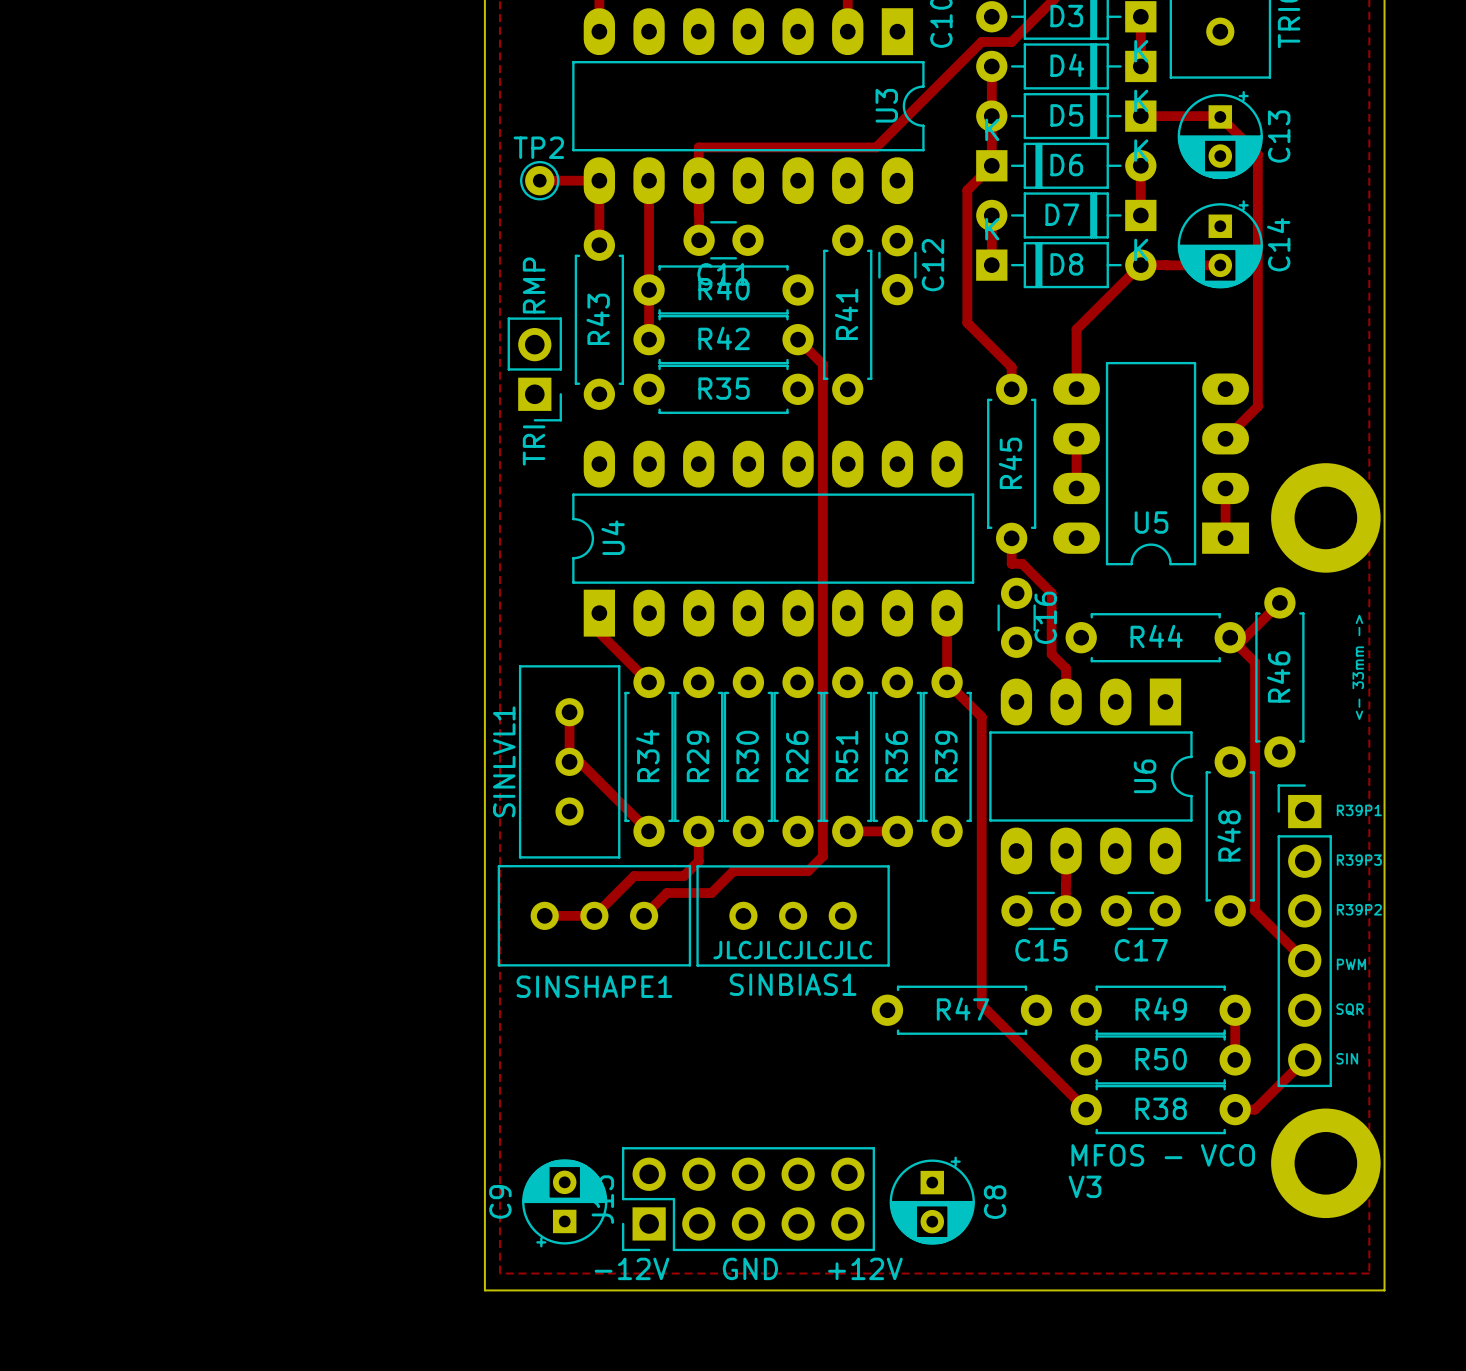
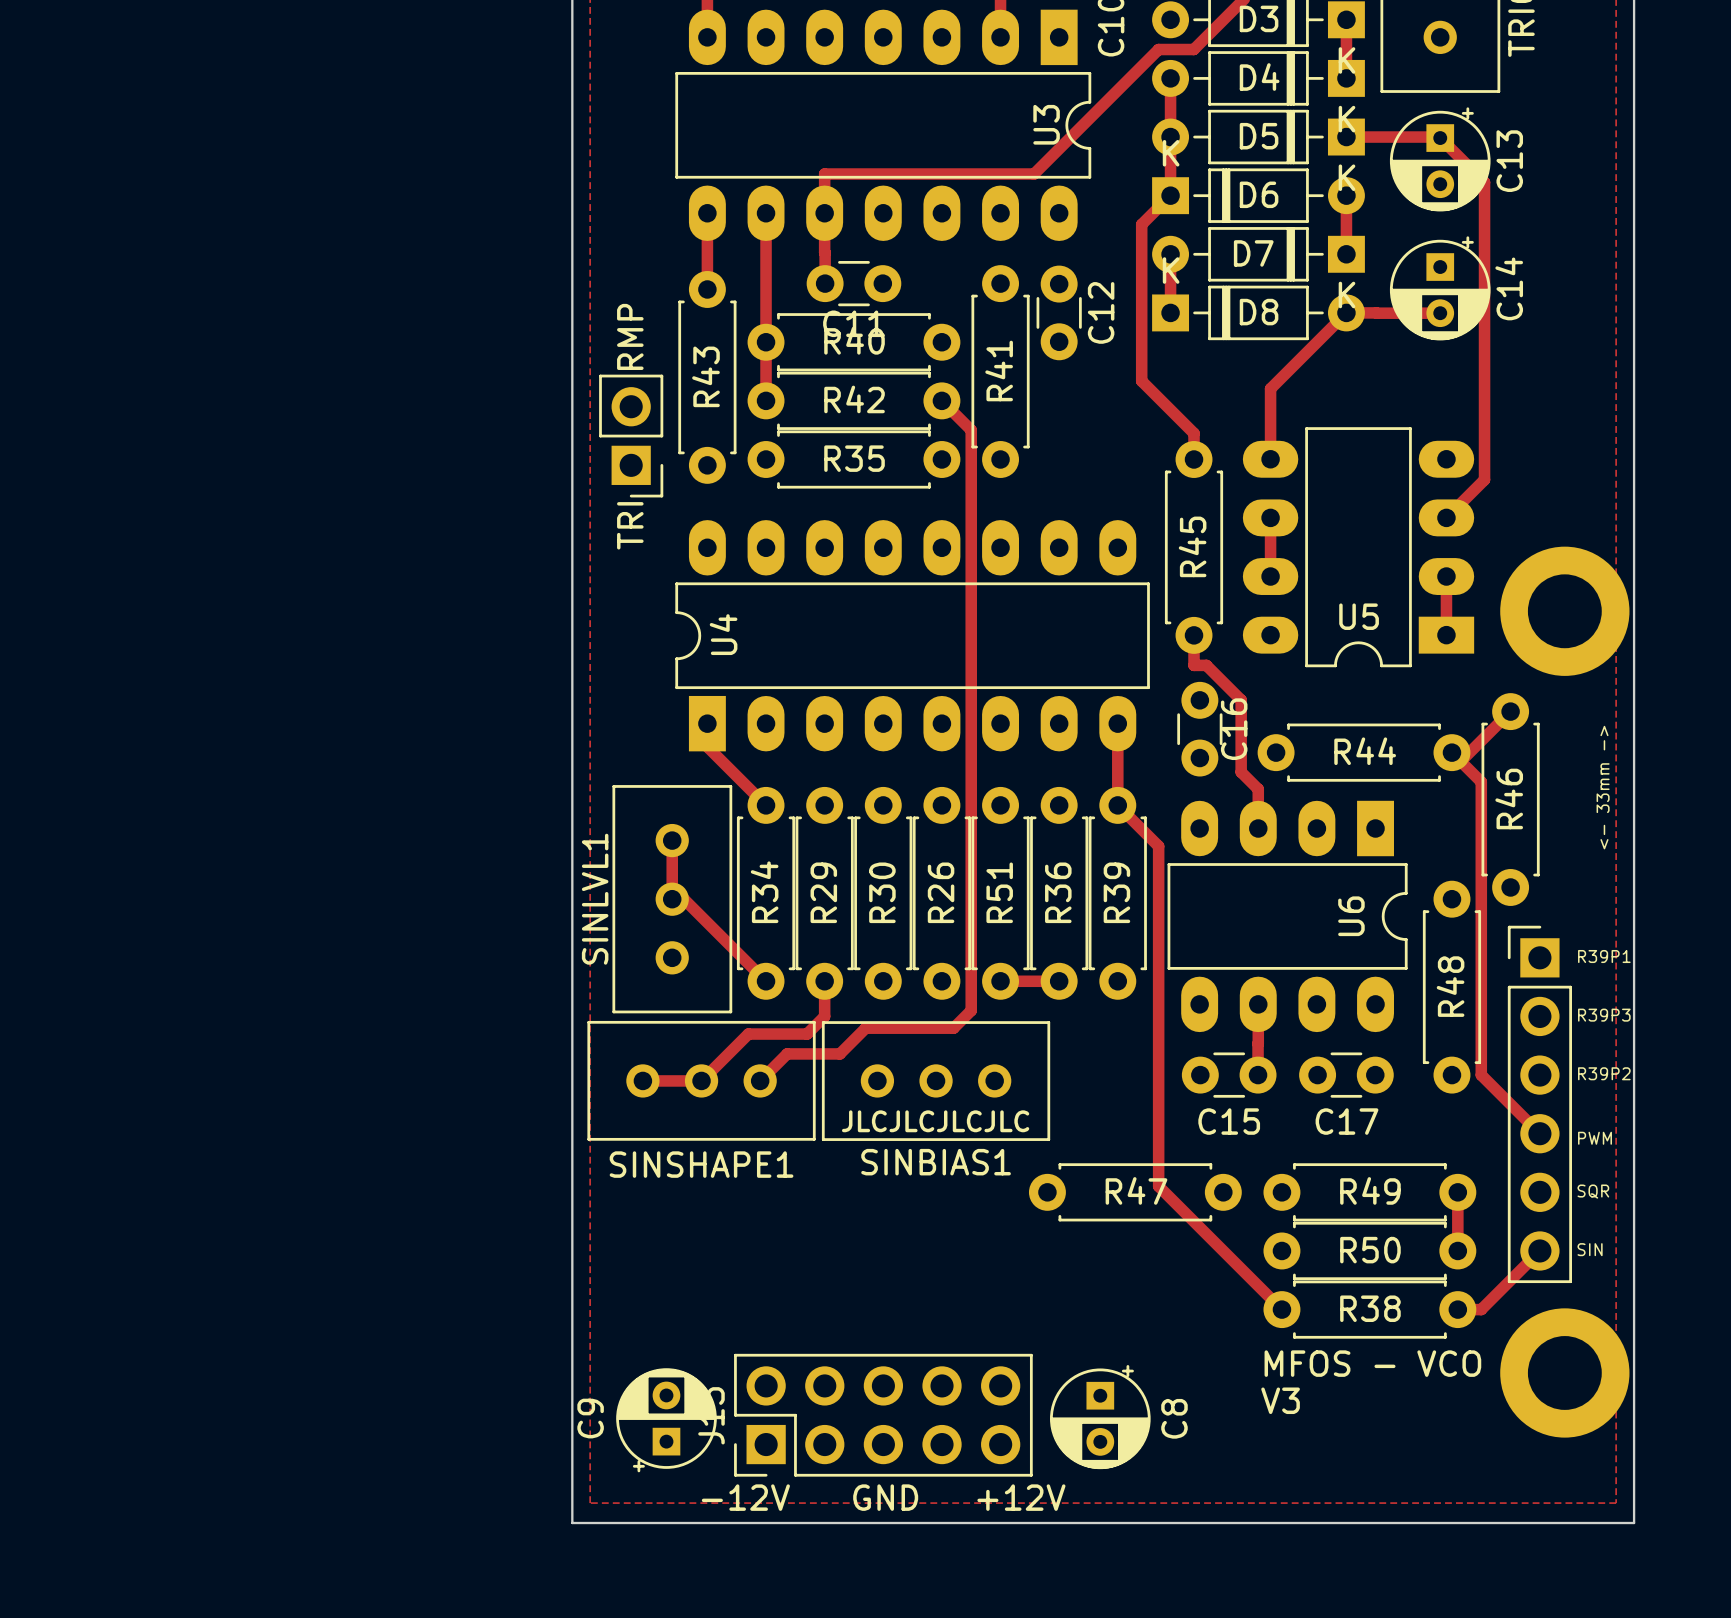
track: (539, 180) (599, 180) -> none
TP2: (539, 180) -> none

